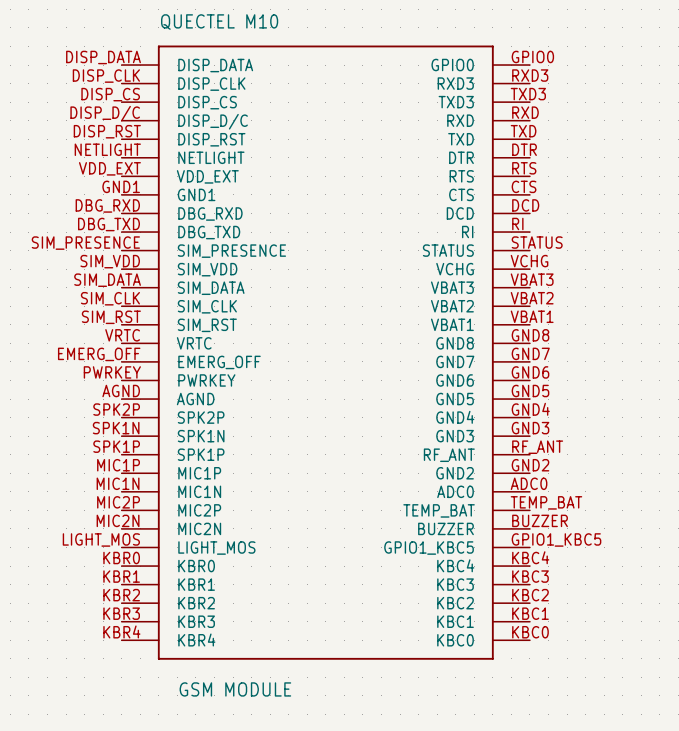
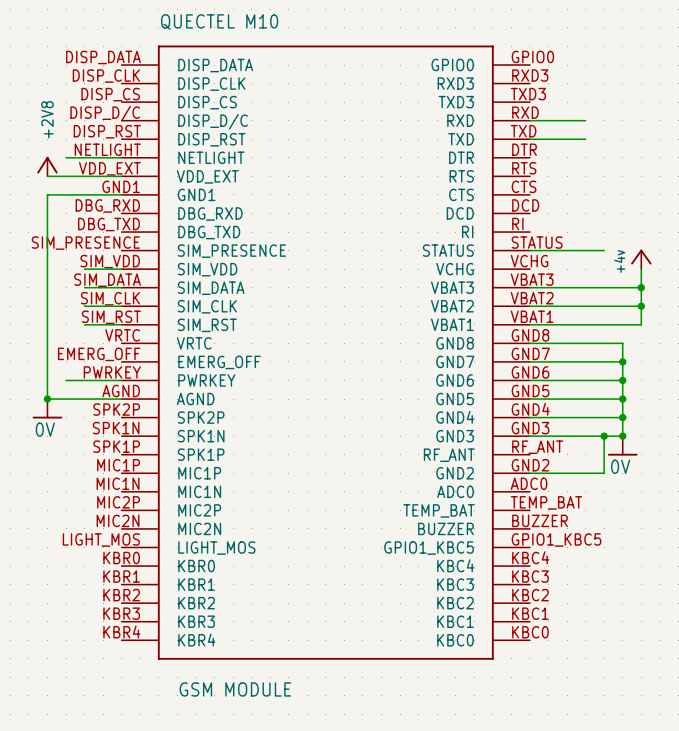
wire: none -> (529, 120) (585, 120)
wire: none -> (529, 139) (585, 139)
wire: none -> (66, 157) (121, 157)
power symbol: none -> (47, 166)
wire: none -> (47, 176) (121, 176)
wire: none -> (121, 194) (47, 194) (47, 399) (121, 399)
wire: none -> (529, 250) (604, 250)
power symbol: none -> (641, 259)
wire: none -> (84, 269) (121, 269)
wire: none -> (641, 269) (641, 324) (529, 324)
wire: none -> (84, 287) (121, 287)
wire: none -> (529, 287) (641, 287)
junction: none -> (641, 287)
wire: none -> (84, 306) (121, 306)
wire: none -> (529, 306) (641, 306)
junction: none -> (641, 306)
wire: none -> (84, 324) (121, 324)
wire: none -> (529, 343) (622, 343) (622, 436) (529, 436)
wire: none -> (529, 361) (622, 361)
junction: none -> (622, 361)
wire: none -> (66, 380) (121, 380)
wire: none -> (529, 380) (622, 380)
junction: none -> (622, 380)
junction: none -> (47, 399)
wire: none -> (529, 399) (622, 399)
junction: none -> (622, 399)
power symbol: none -> 0V (47, 408)
wire: none -> (529, 417) (622, 417)
junction: none -> (622, 417)
wire: none -> (604, 436) (604, 473) (529, 473)
junction: none -> (604, 436)
junction: none -> (622, 436)
power symbol: none -> 0V (622, 445)

